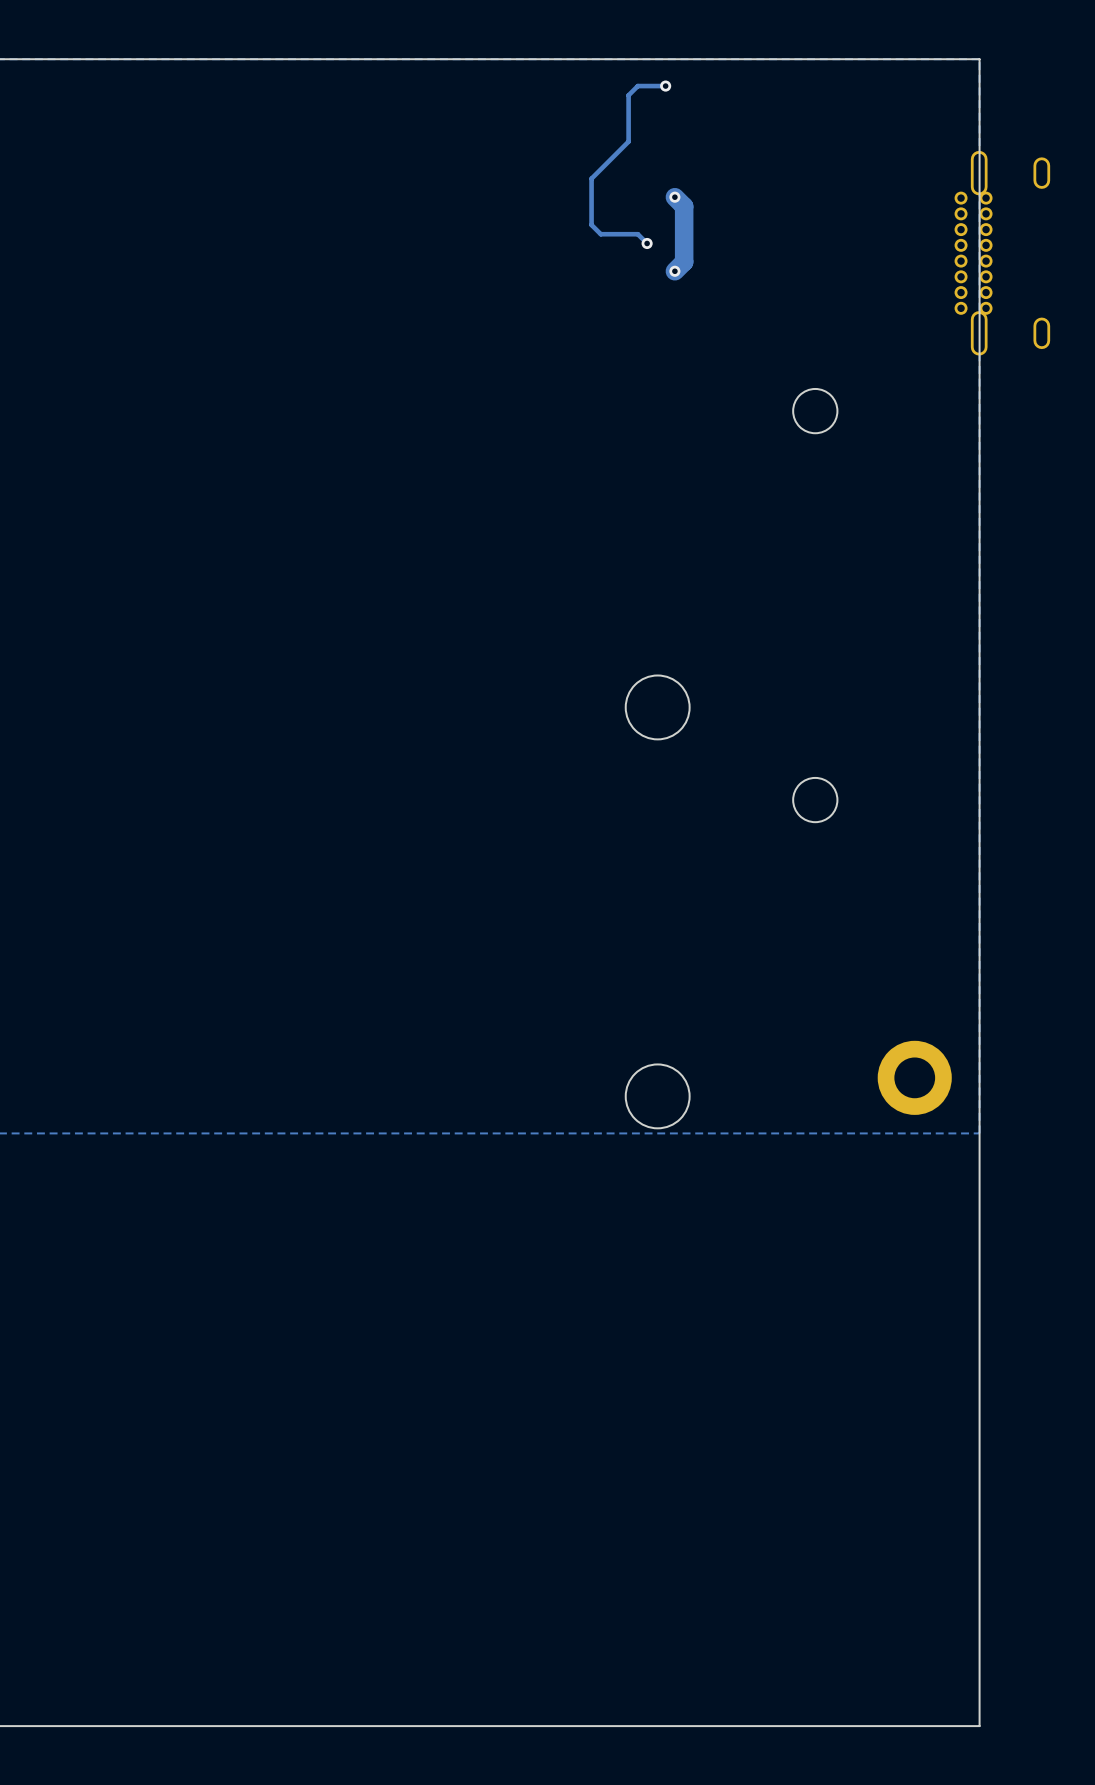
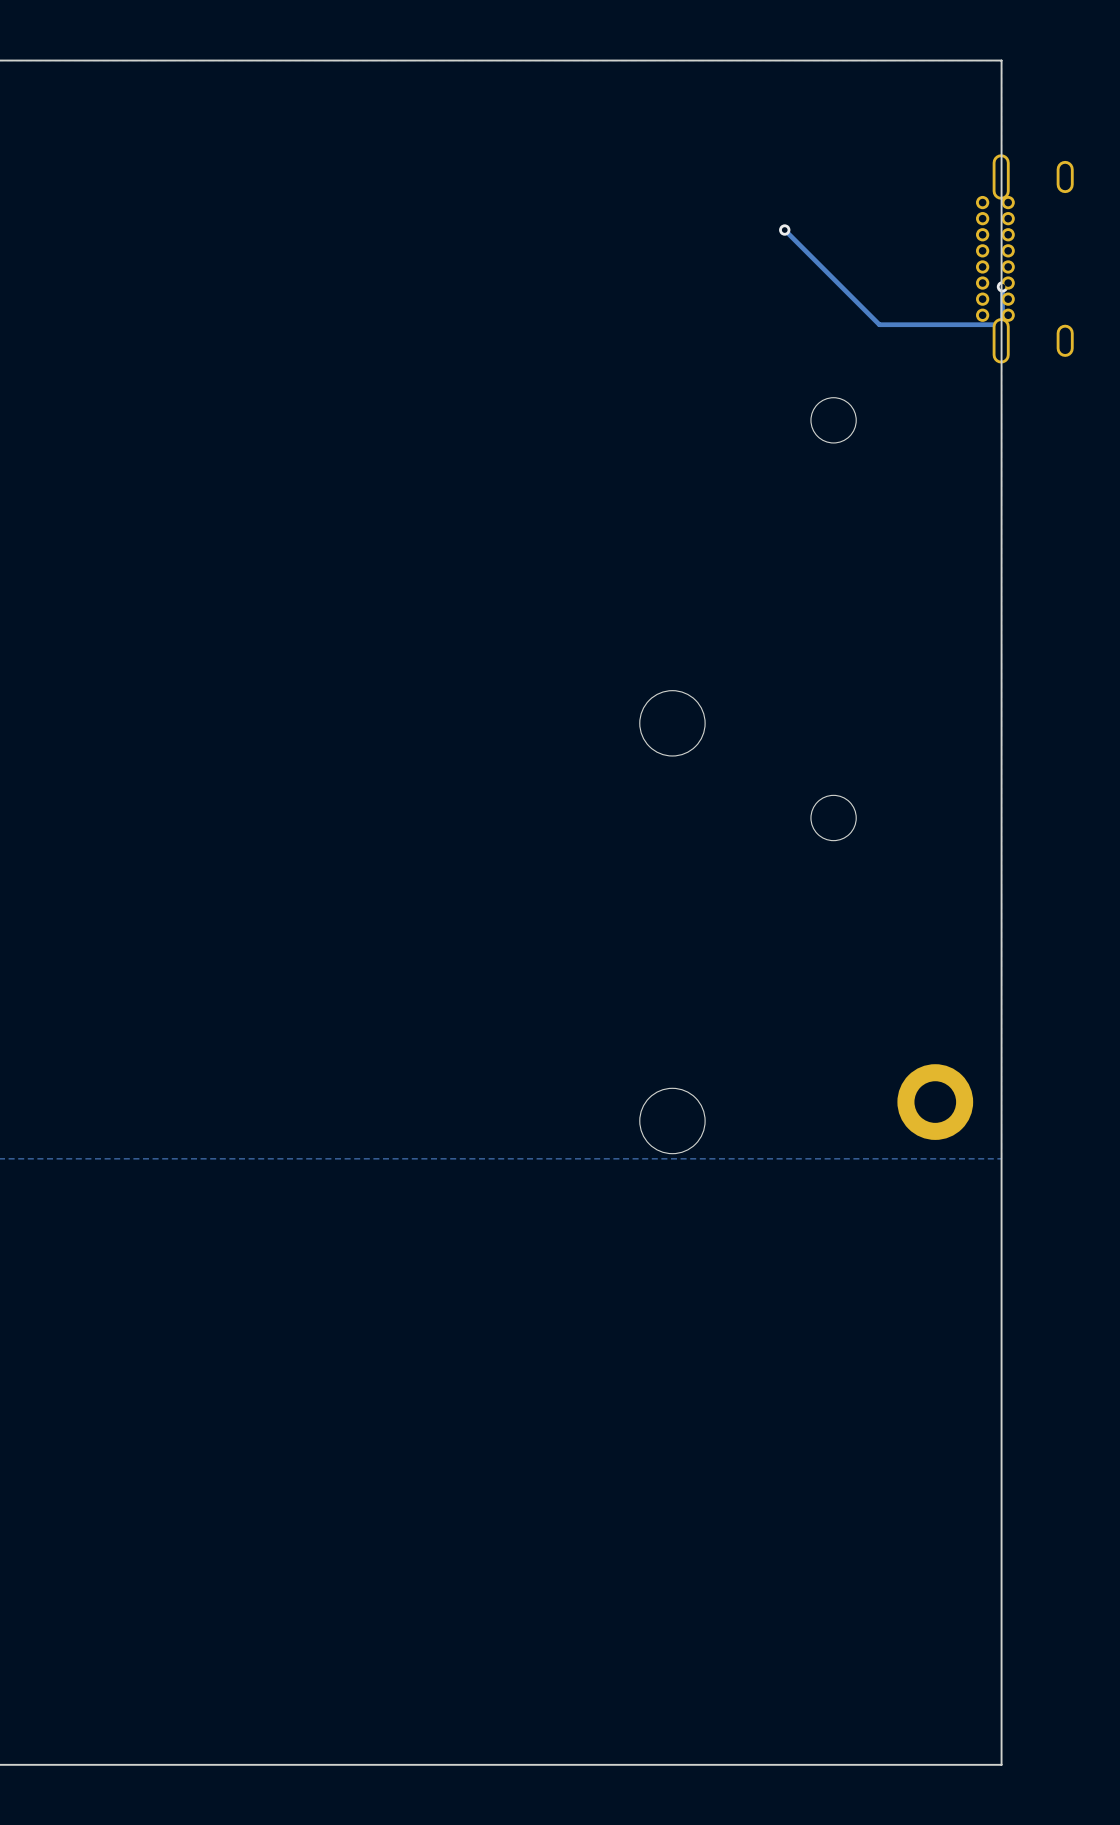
track: (665, 86) (637, 86) (628, 95) (628, 141) (591, 178) (591, 224) (600, 234) (637, 234) (647, 243) -> none
via: (665, 86) -> none
track: (674, 197) (684, 206) (684, 262) (674, 271) -> none
via: (674, 197) -> none
track: none -> (784, 230) (879, 324) (1002, 324) (1002, 286)
via: none -> (784, 230)
via: (647, 243) -> none
via: (674, 271) -> none
via: none -> (1002, 286)

